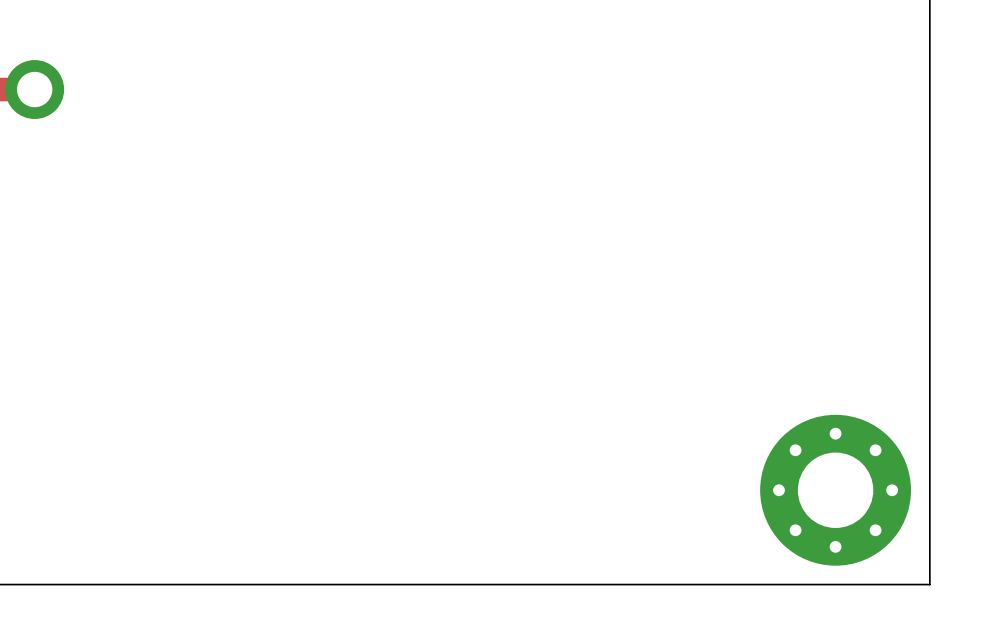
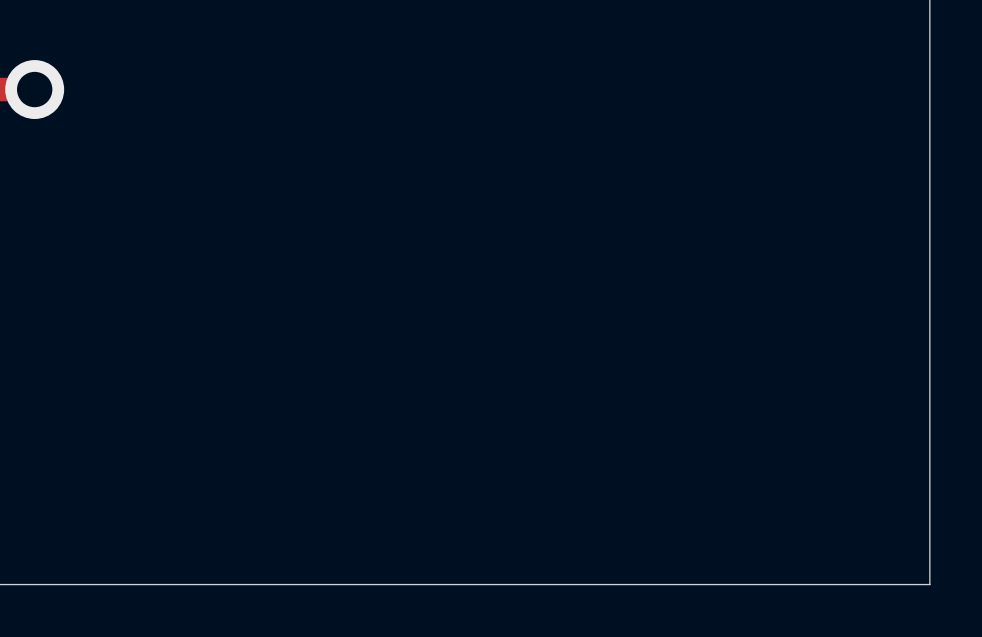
part: (835, 490) -> none

